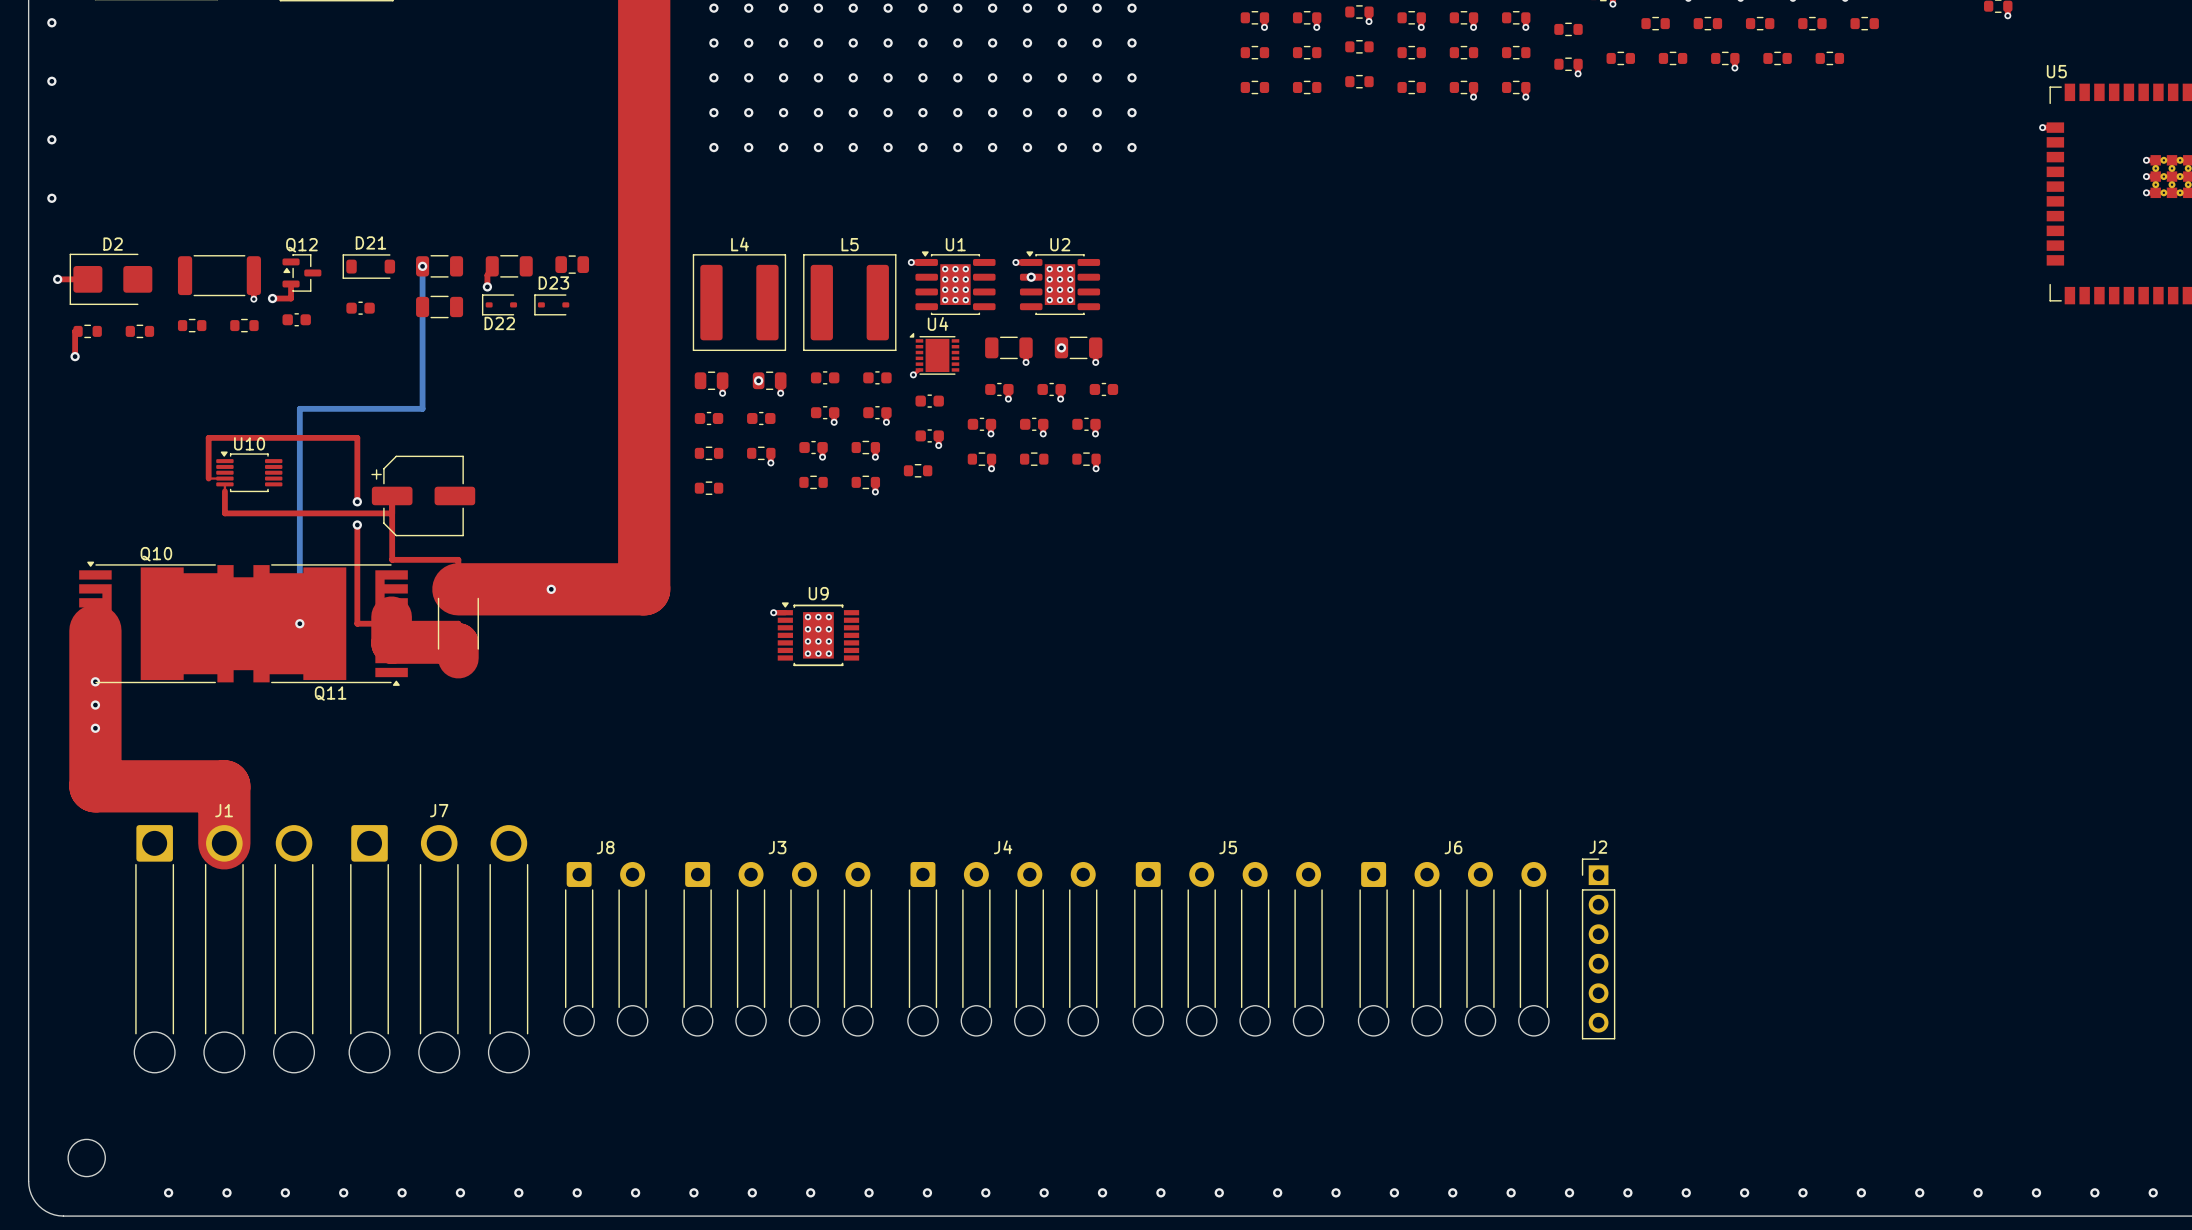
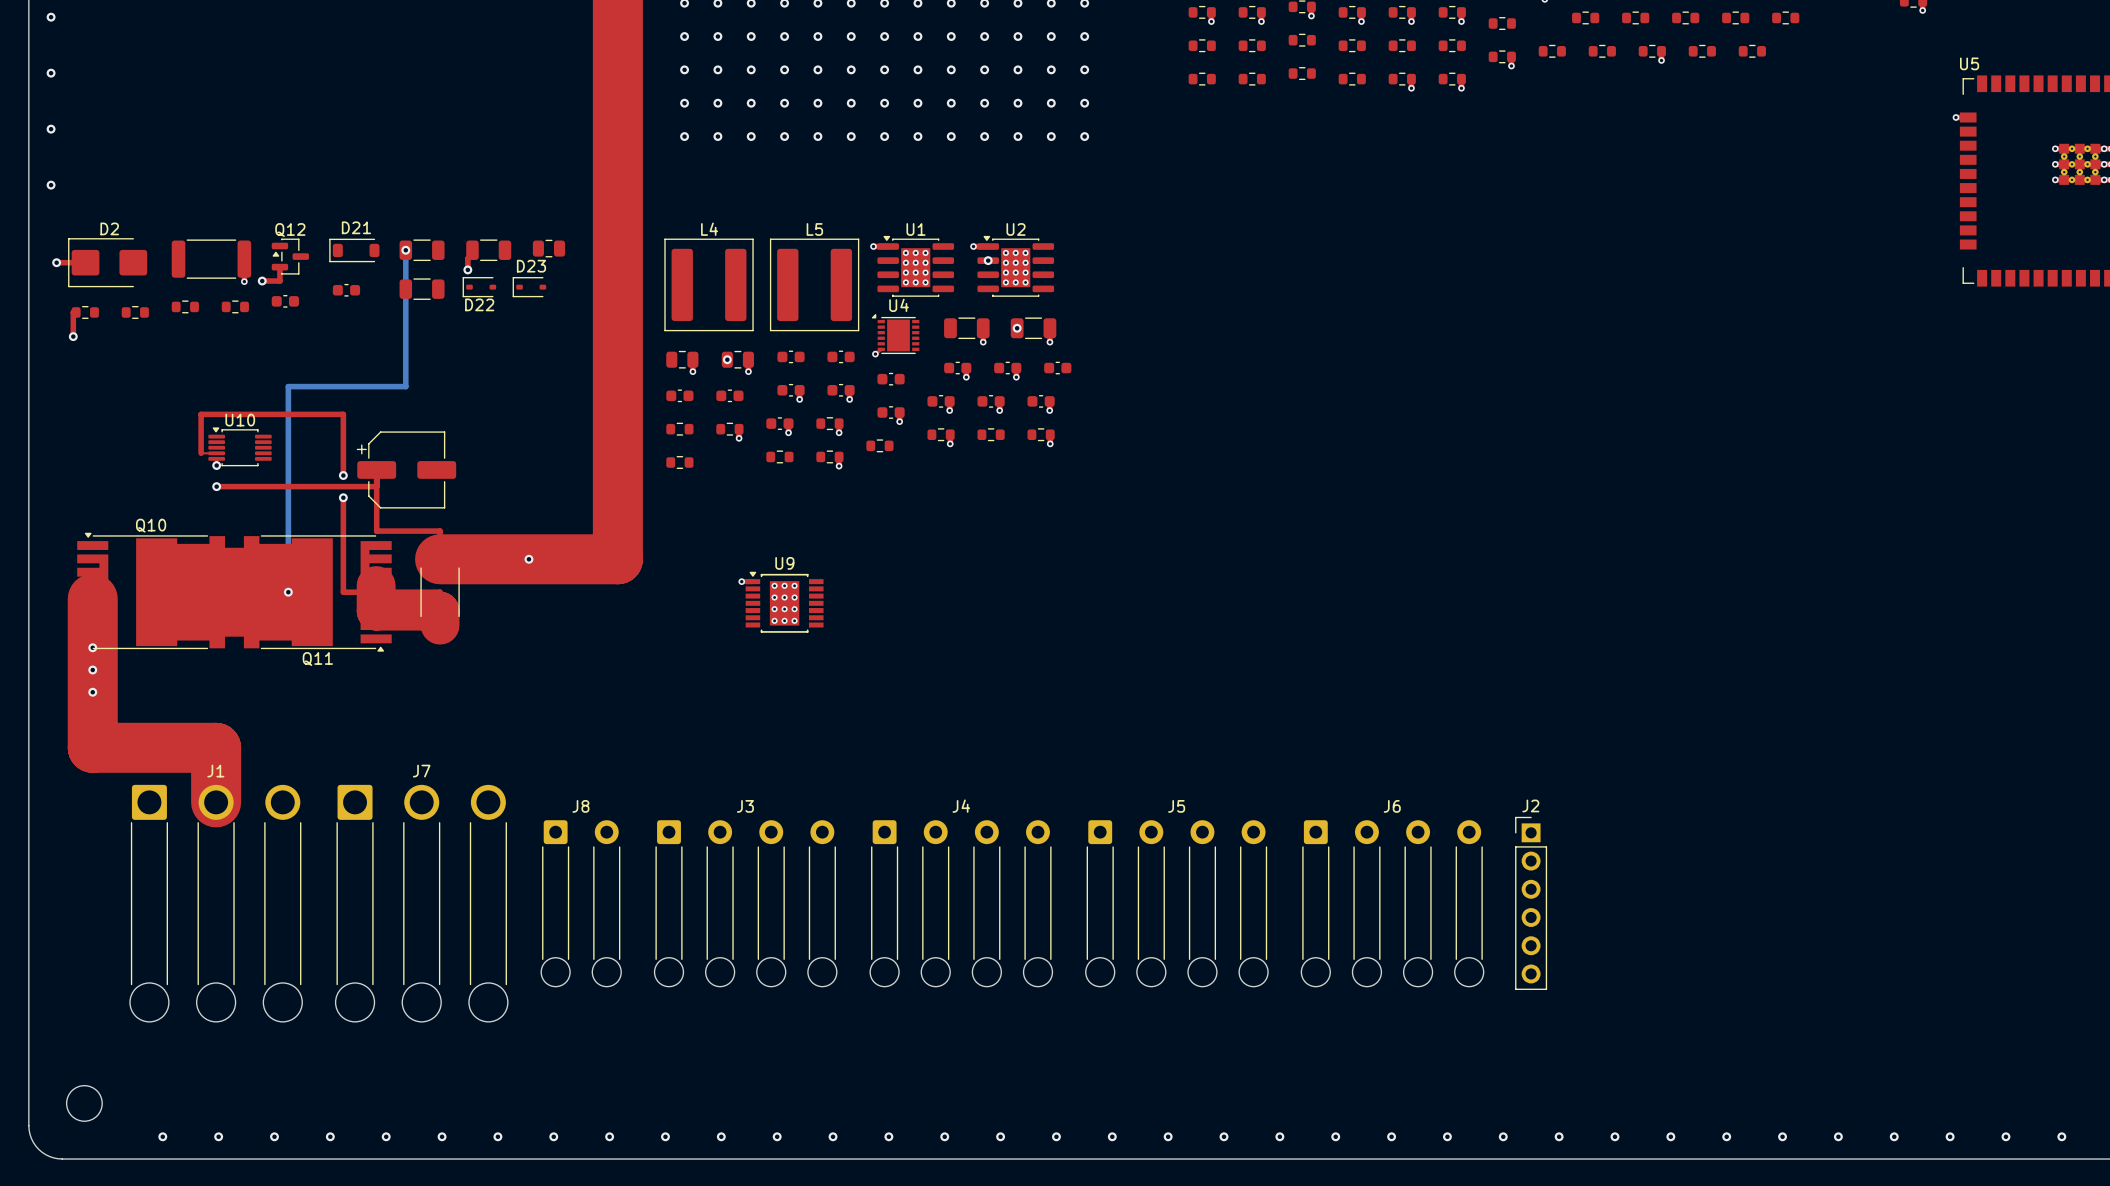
top track: (224, 491) (224, 513) -> none
via: none -> (216, 465)
via: none -> (216, 486)

